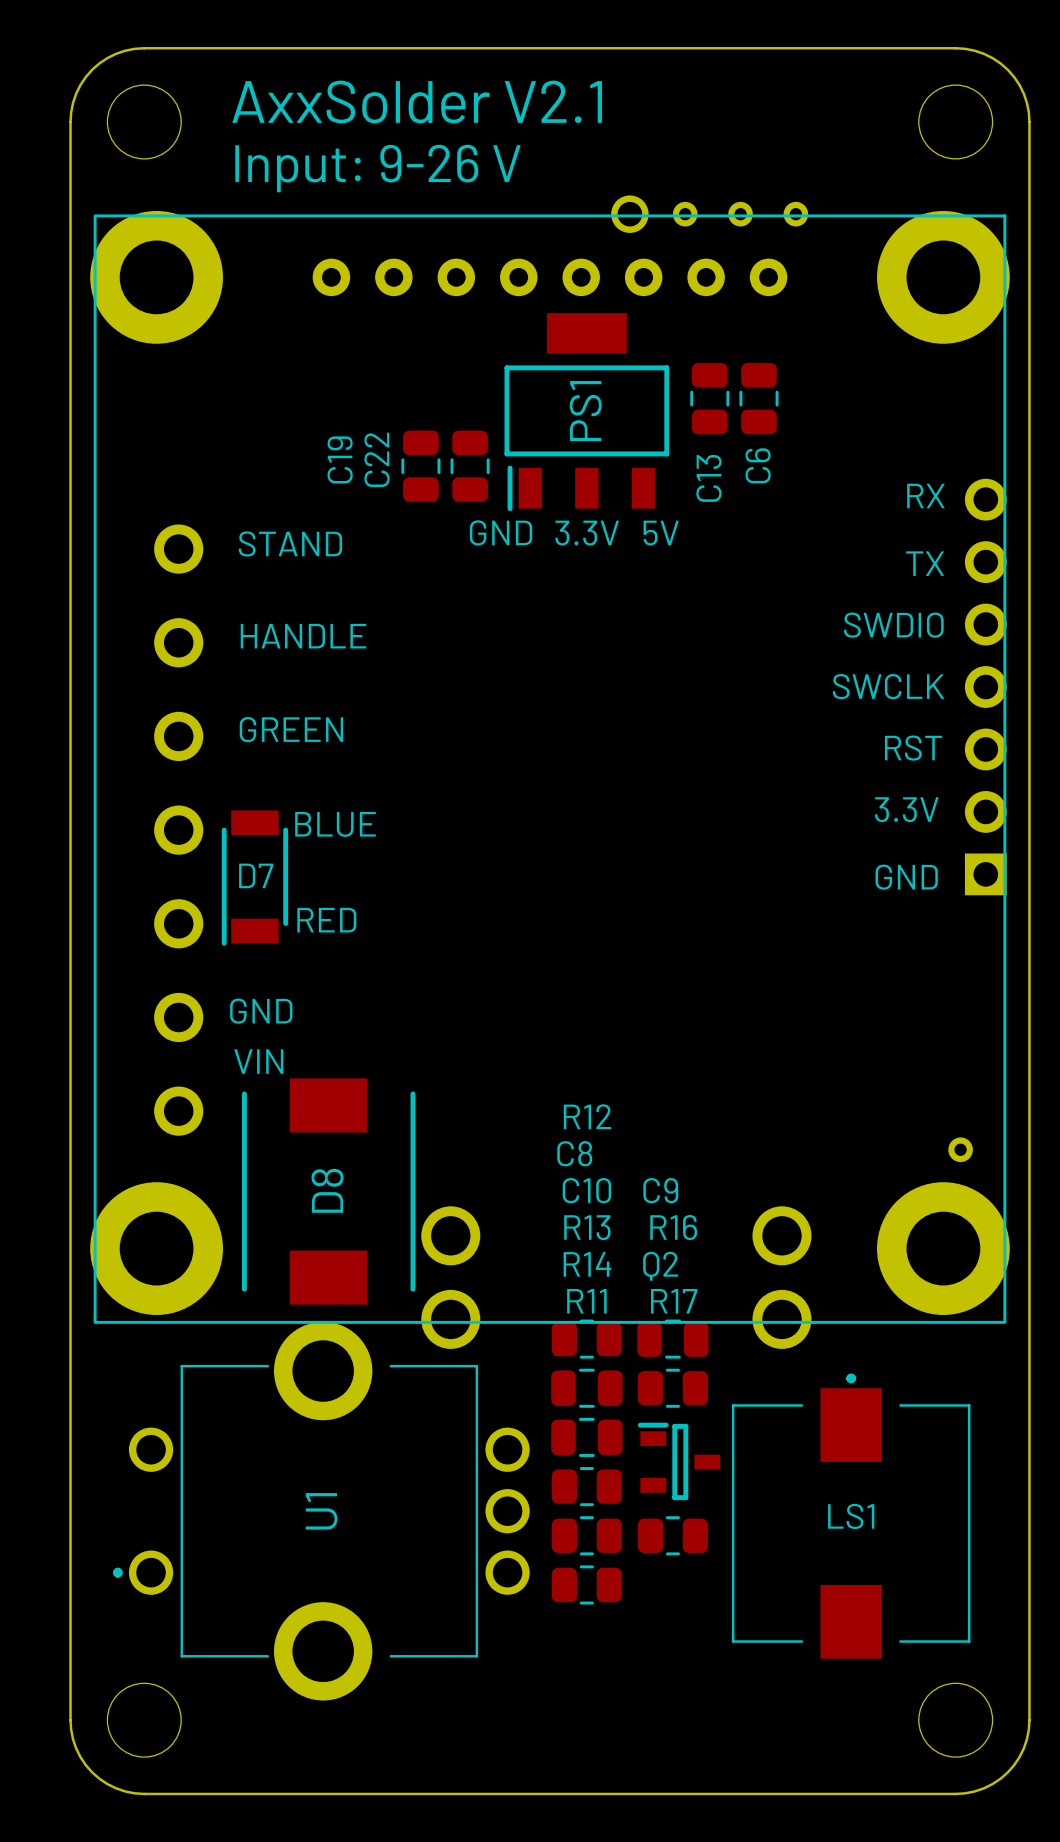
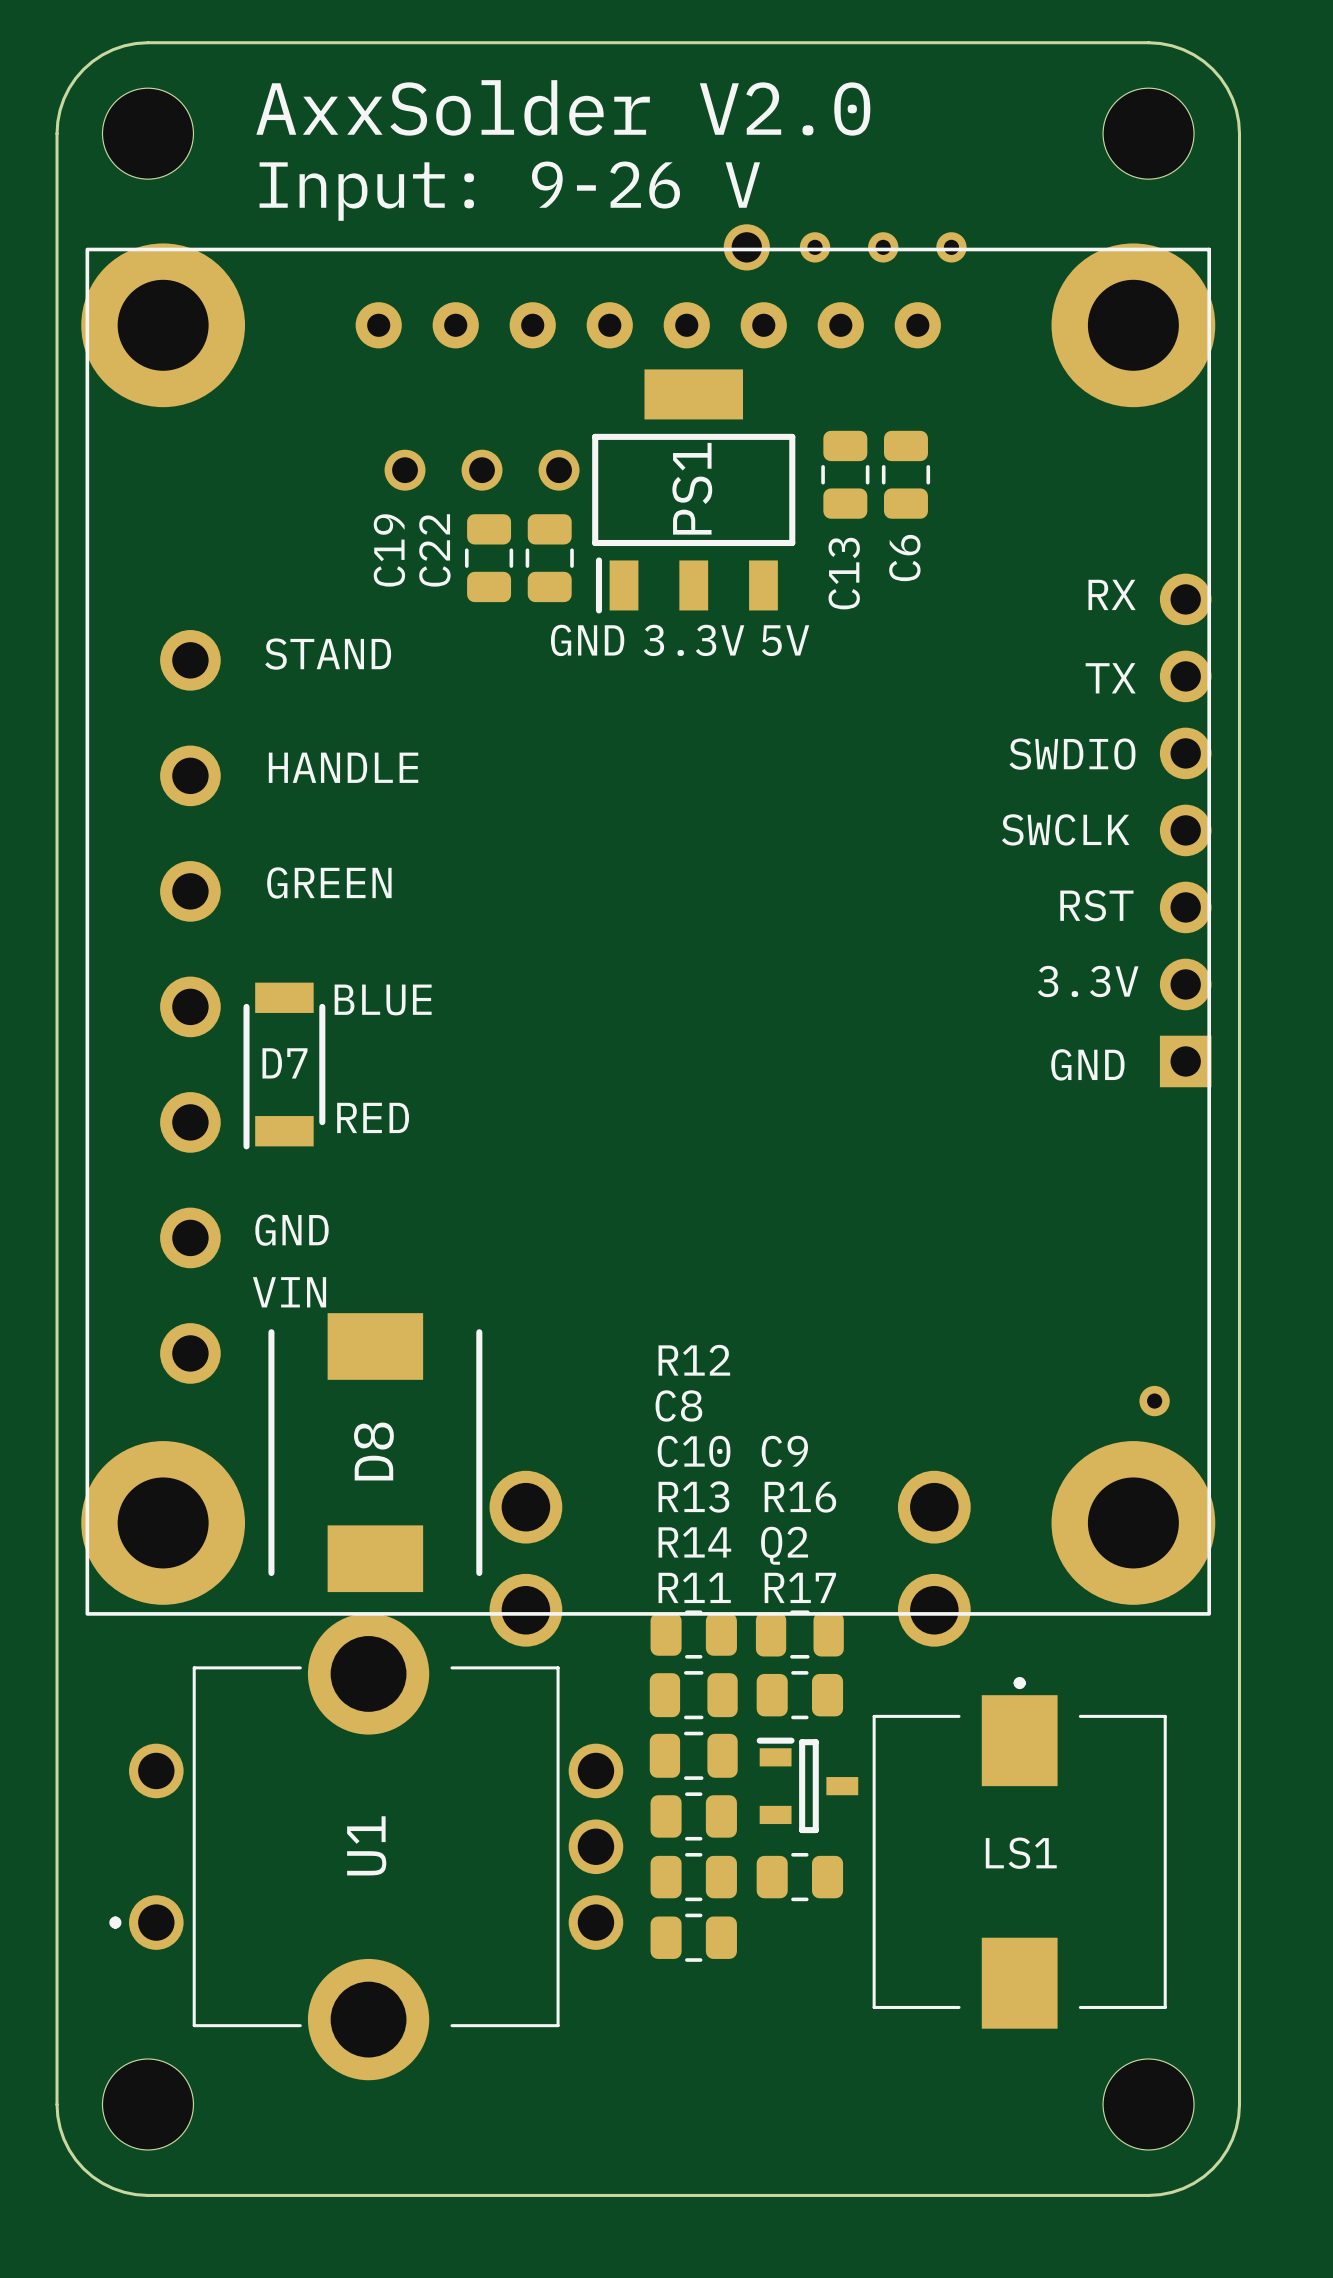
text: AxxSolder V2.1 (417, 102) -> AxxSolder V2.0 (563, 107)
part: none -> (482, 470)

